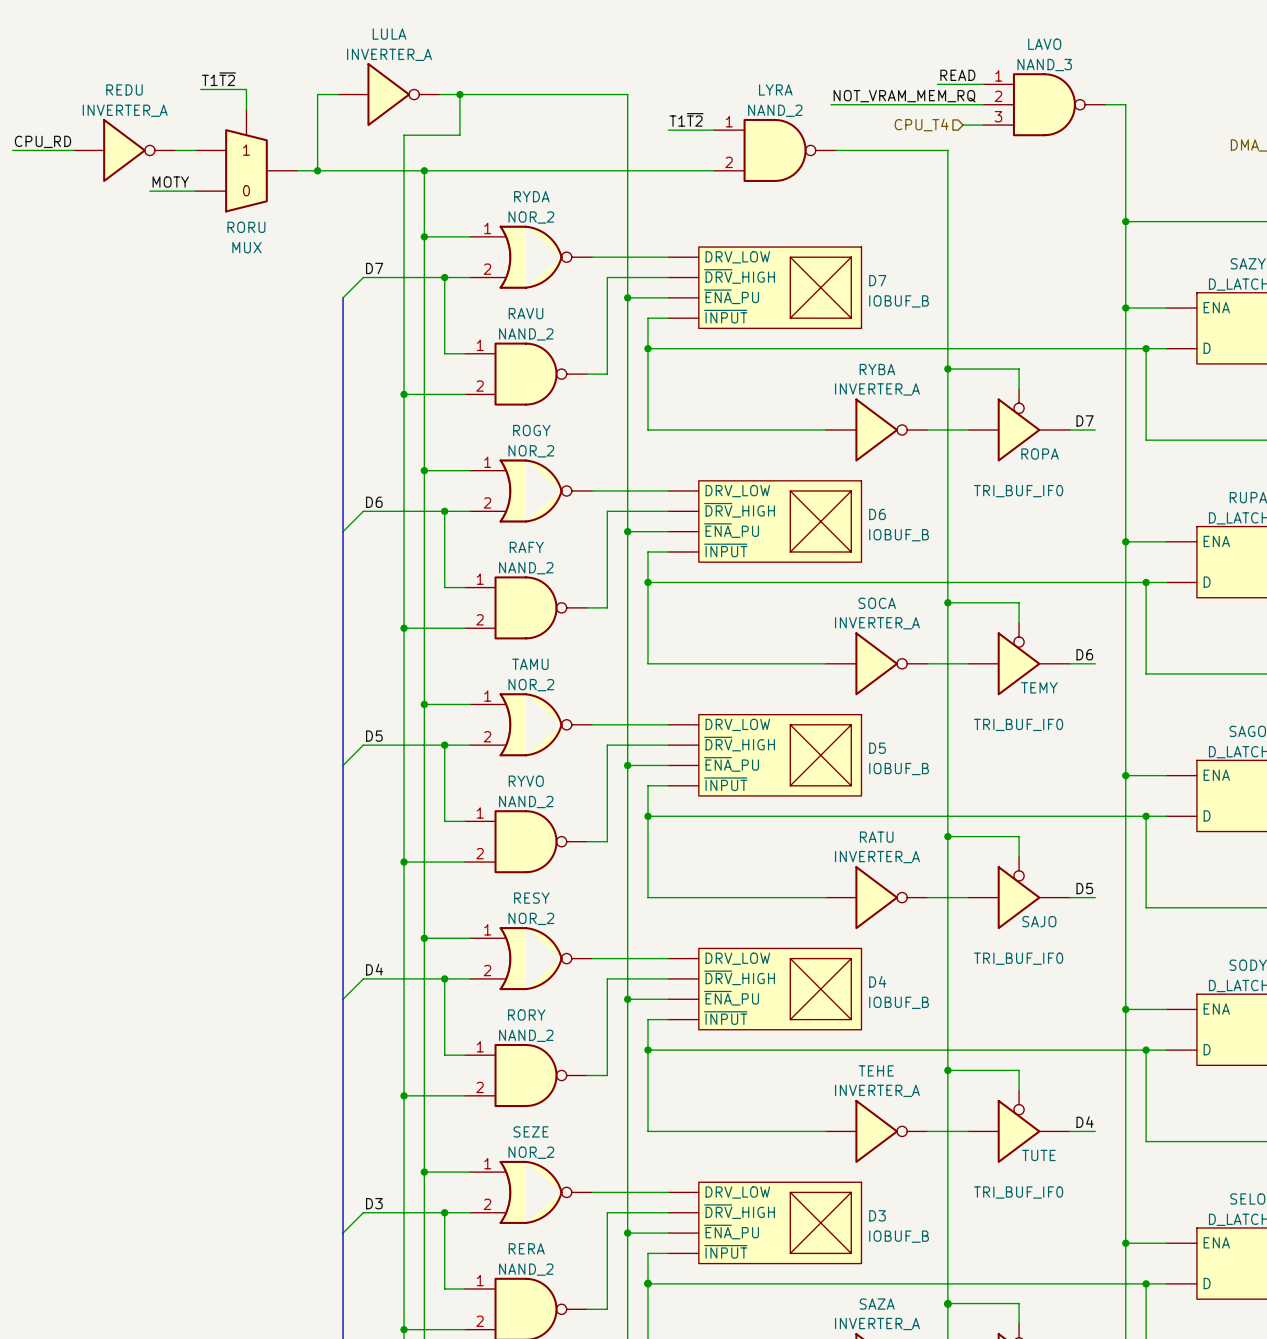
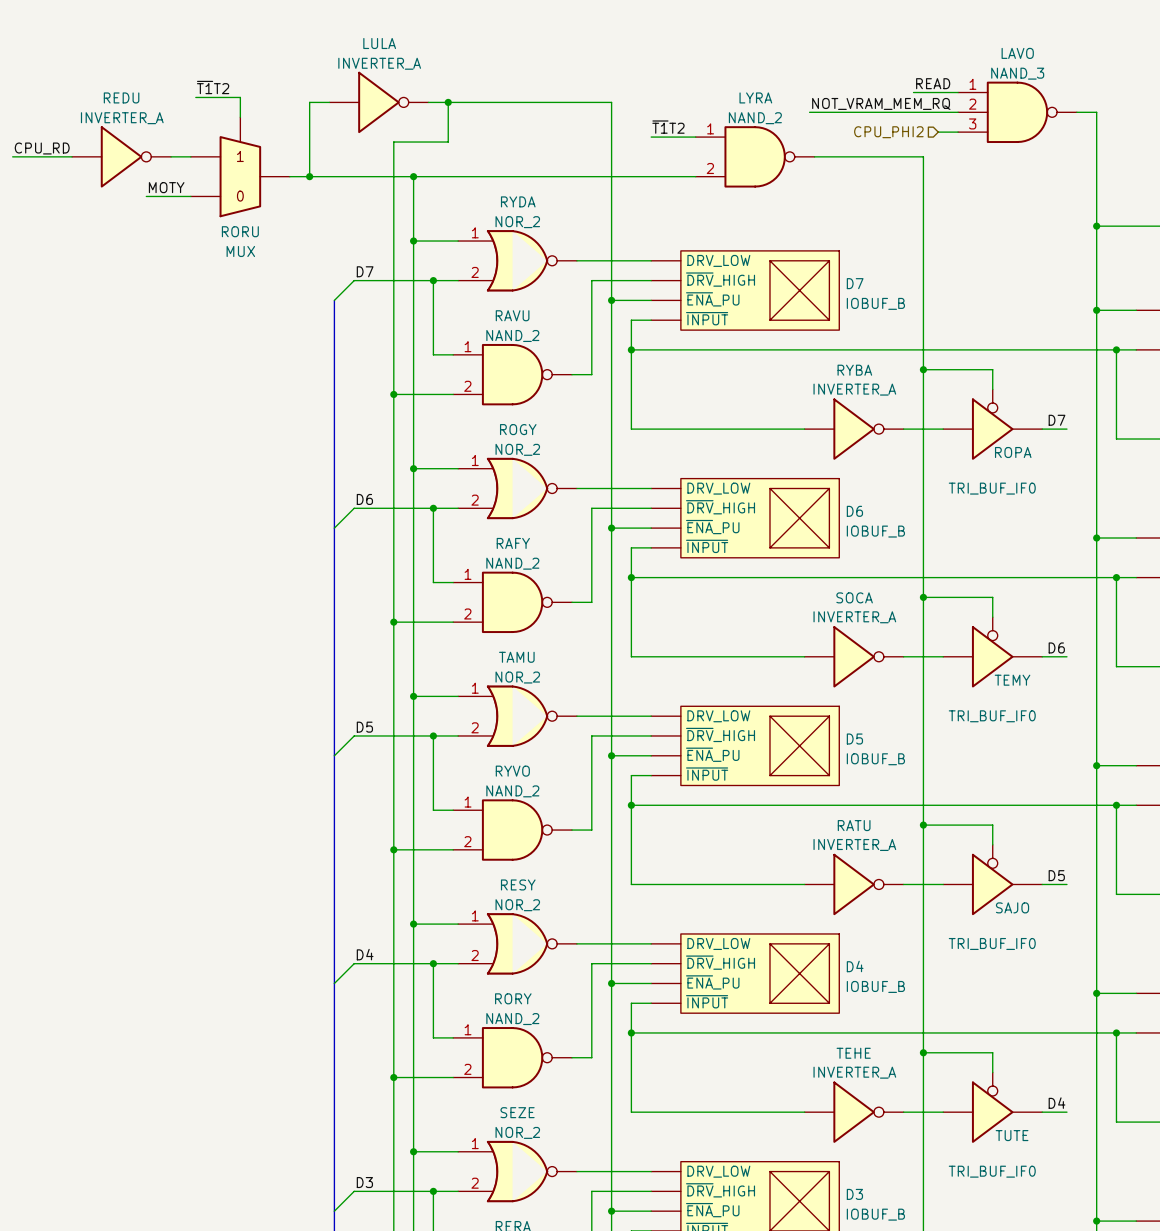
label: T1~{T2} (218, 79) -> ~{T1}T2 (213, 87)
label: T1~{T2} (686, 119) -> ~{T1}T2 (668, 127)
hierarchical label: CPU_T4 (921, 124) -> CPU_PHI2 (888, 132)

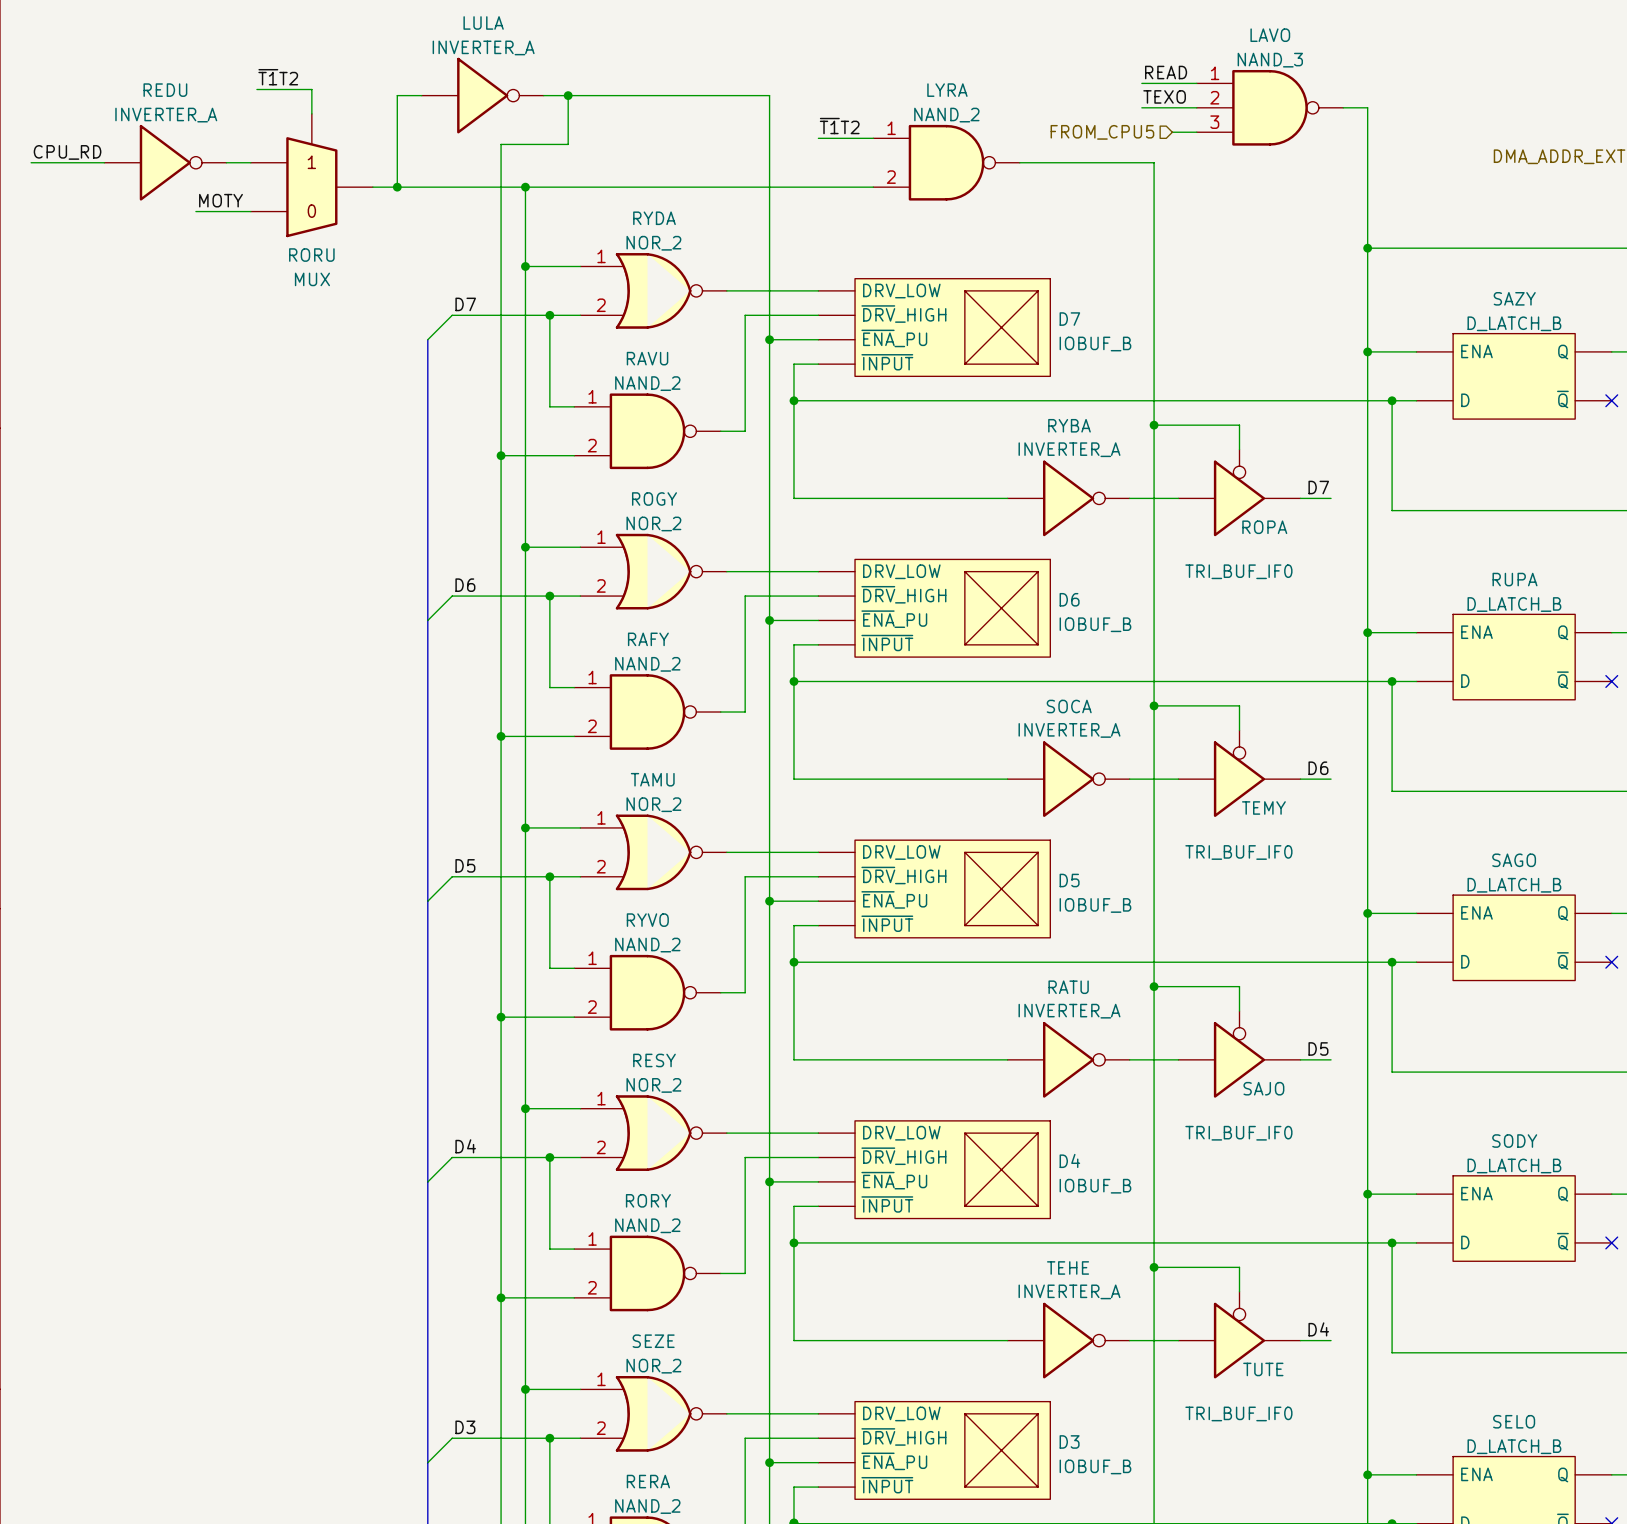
label: NOT_VRAM_MEM_RQ (881, 103) -> none
label: none -> TEXO (1164, 96)
wire: (809, 112) (913, 112) -> none
hierarchical label: CPU_PHI2 (888, 132) -> FROM_CPU5 (1102, 132)

